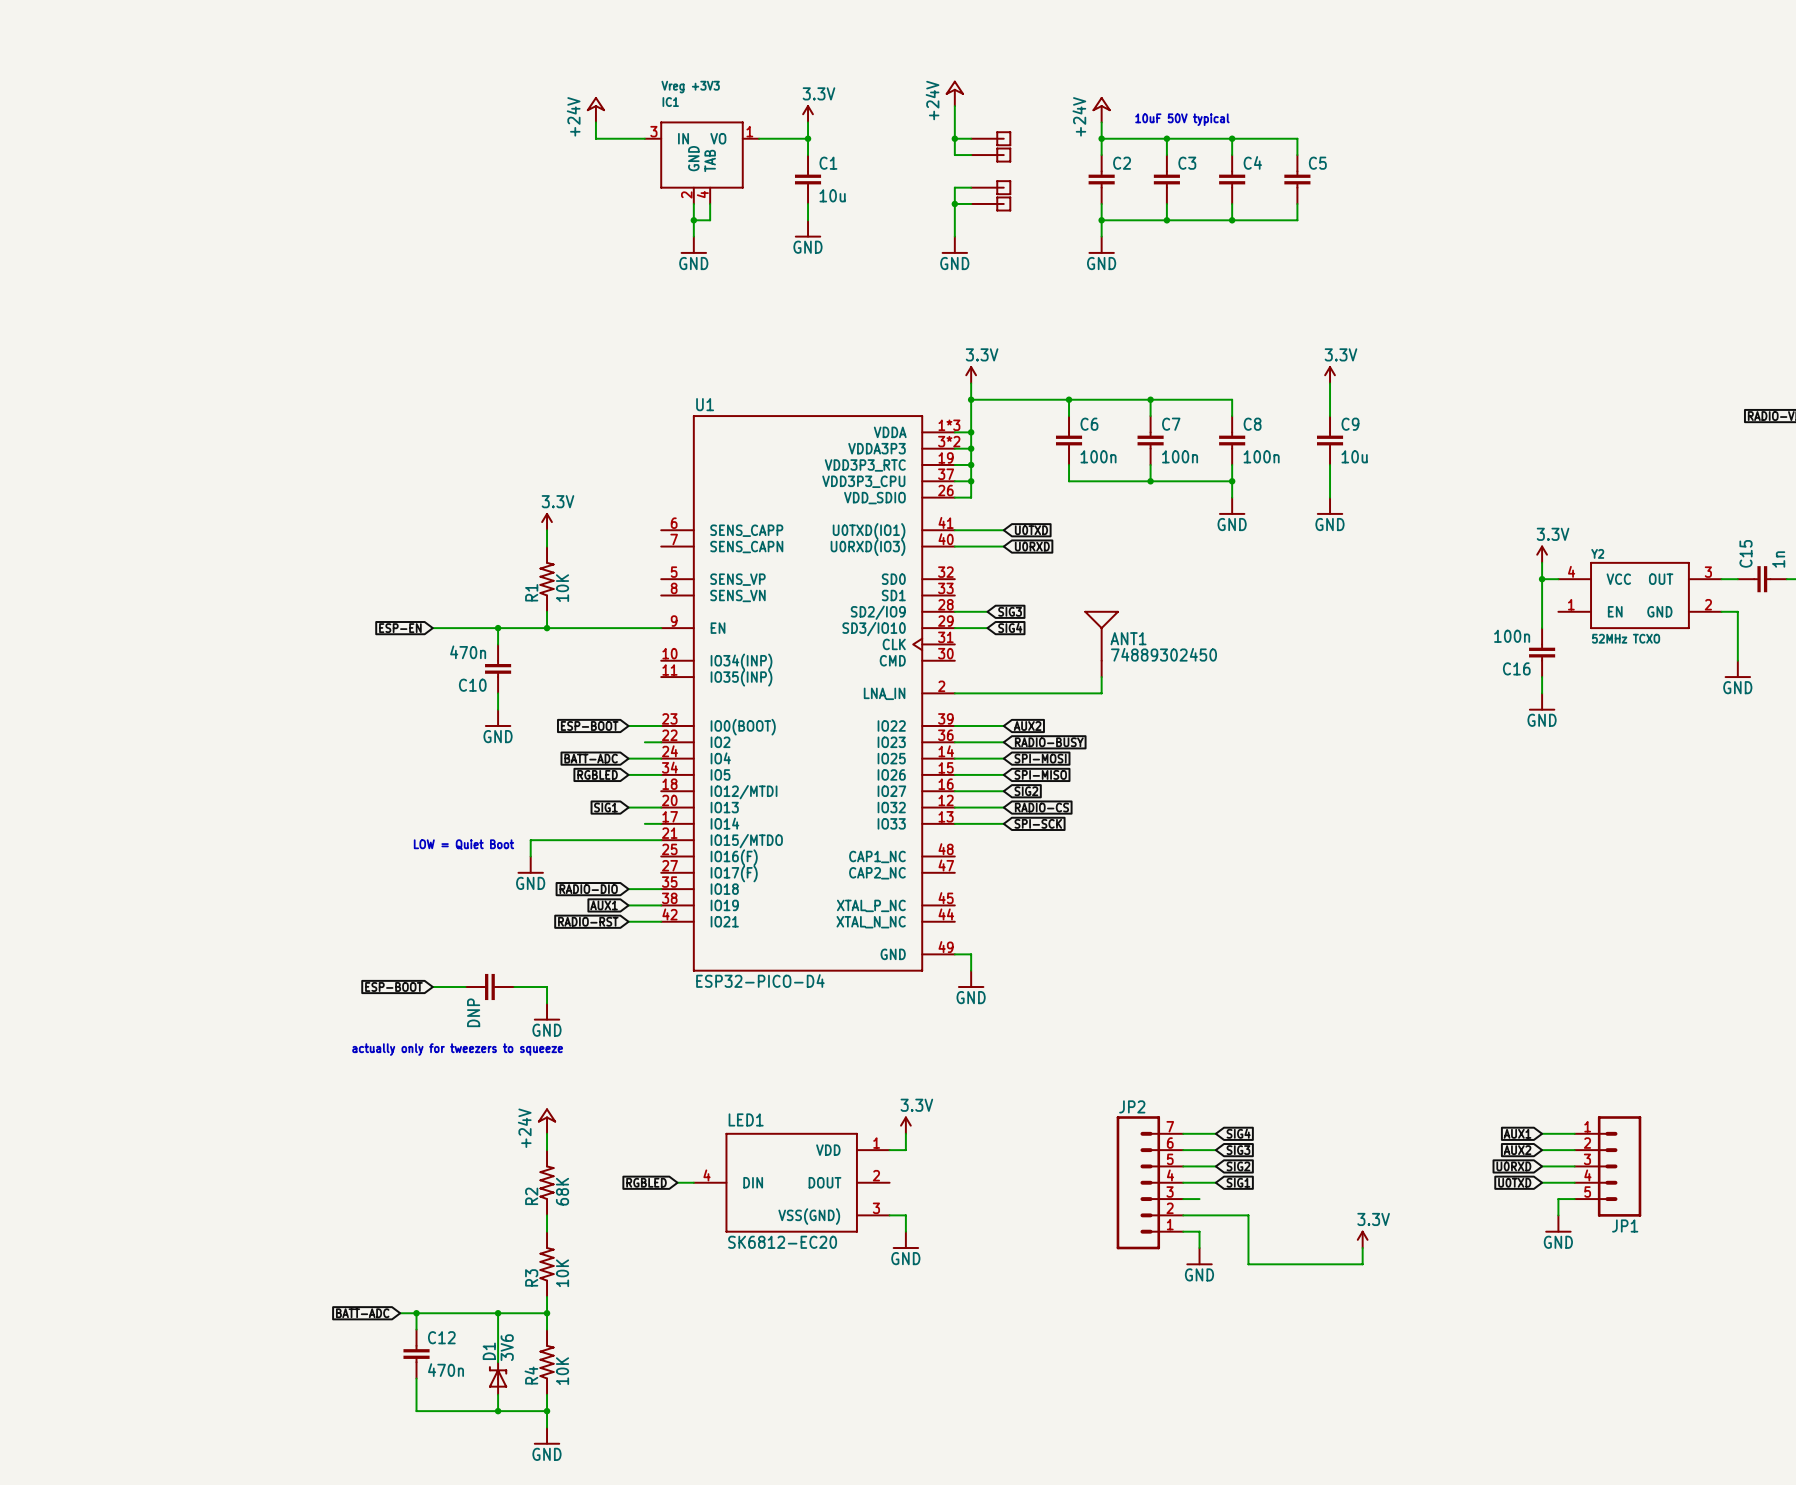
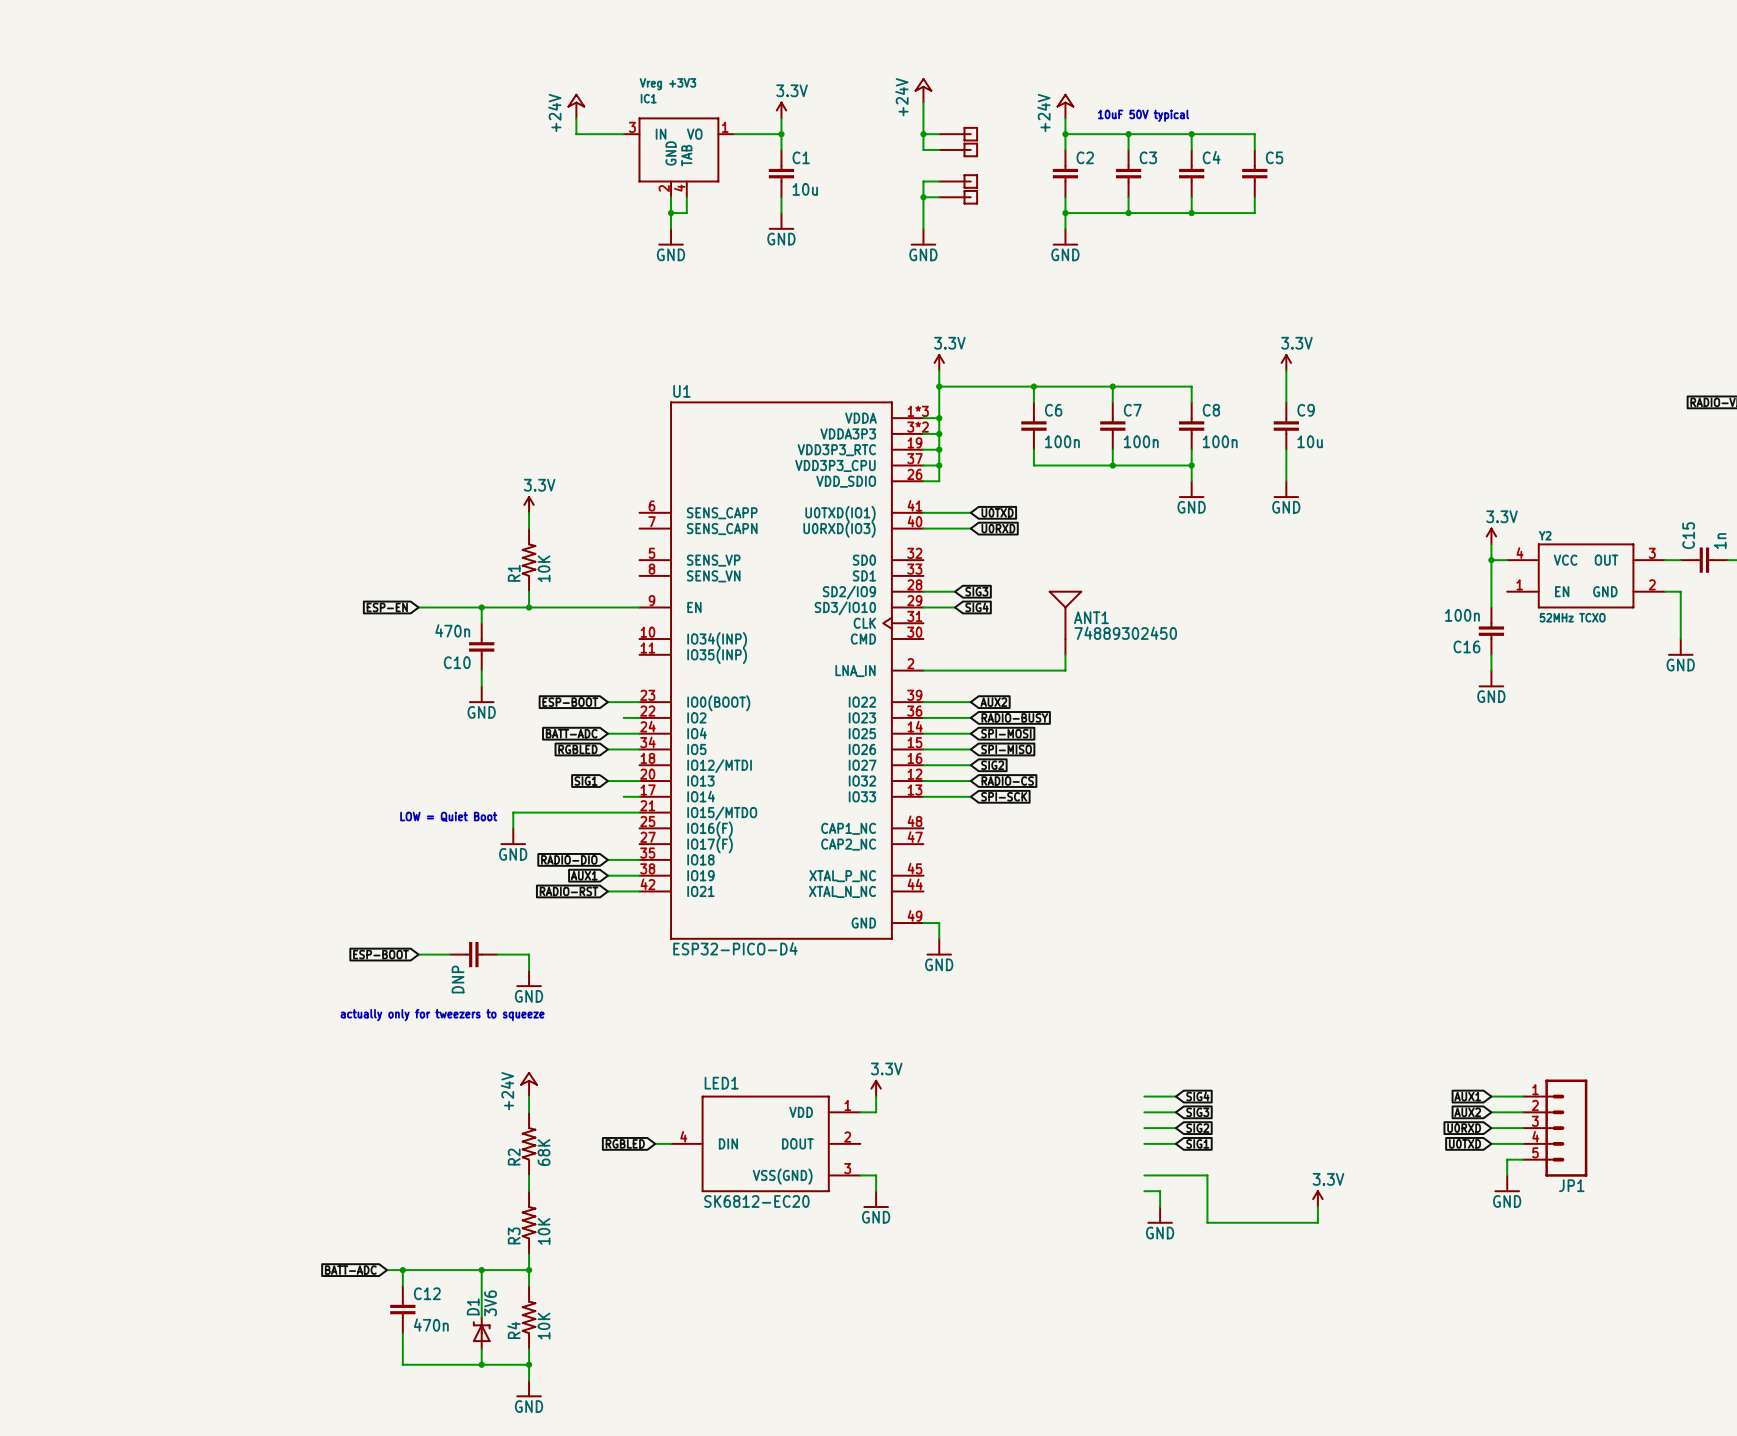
JP2: (1149, 1182) -> none
wire: (1183, 1199) (1199, 1199) -> none

